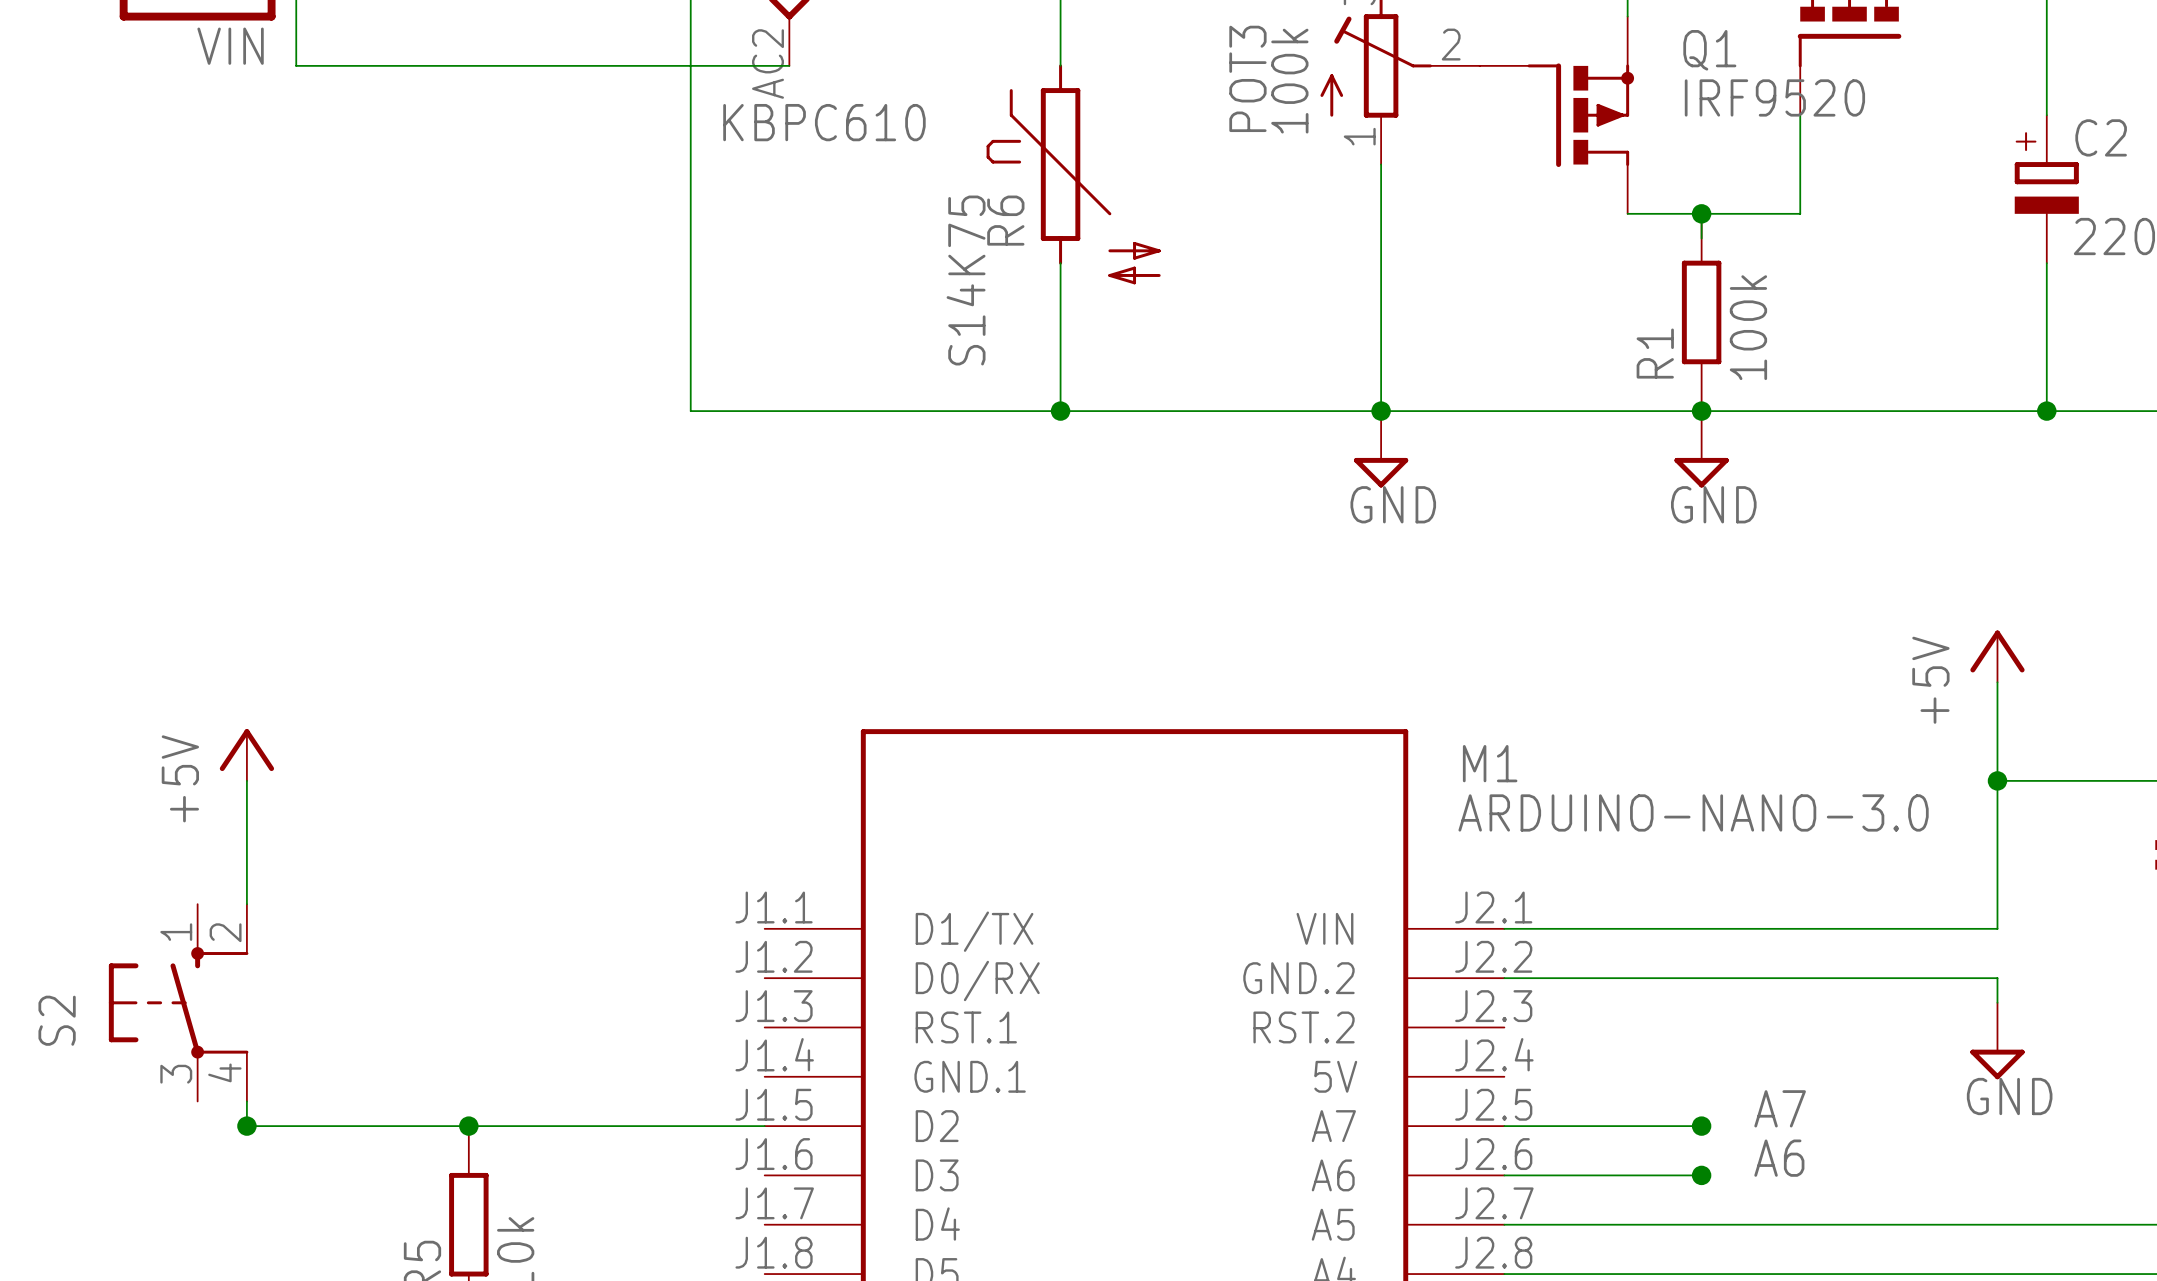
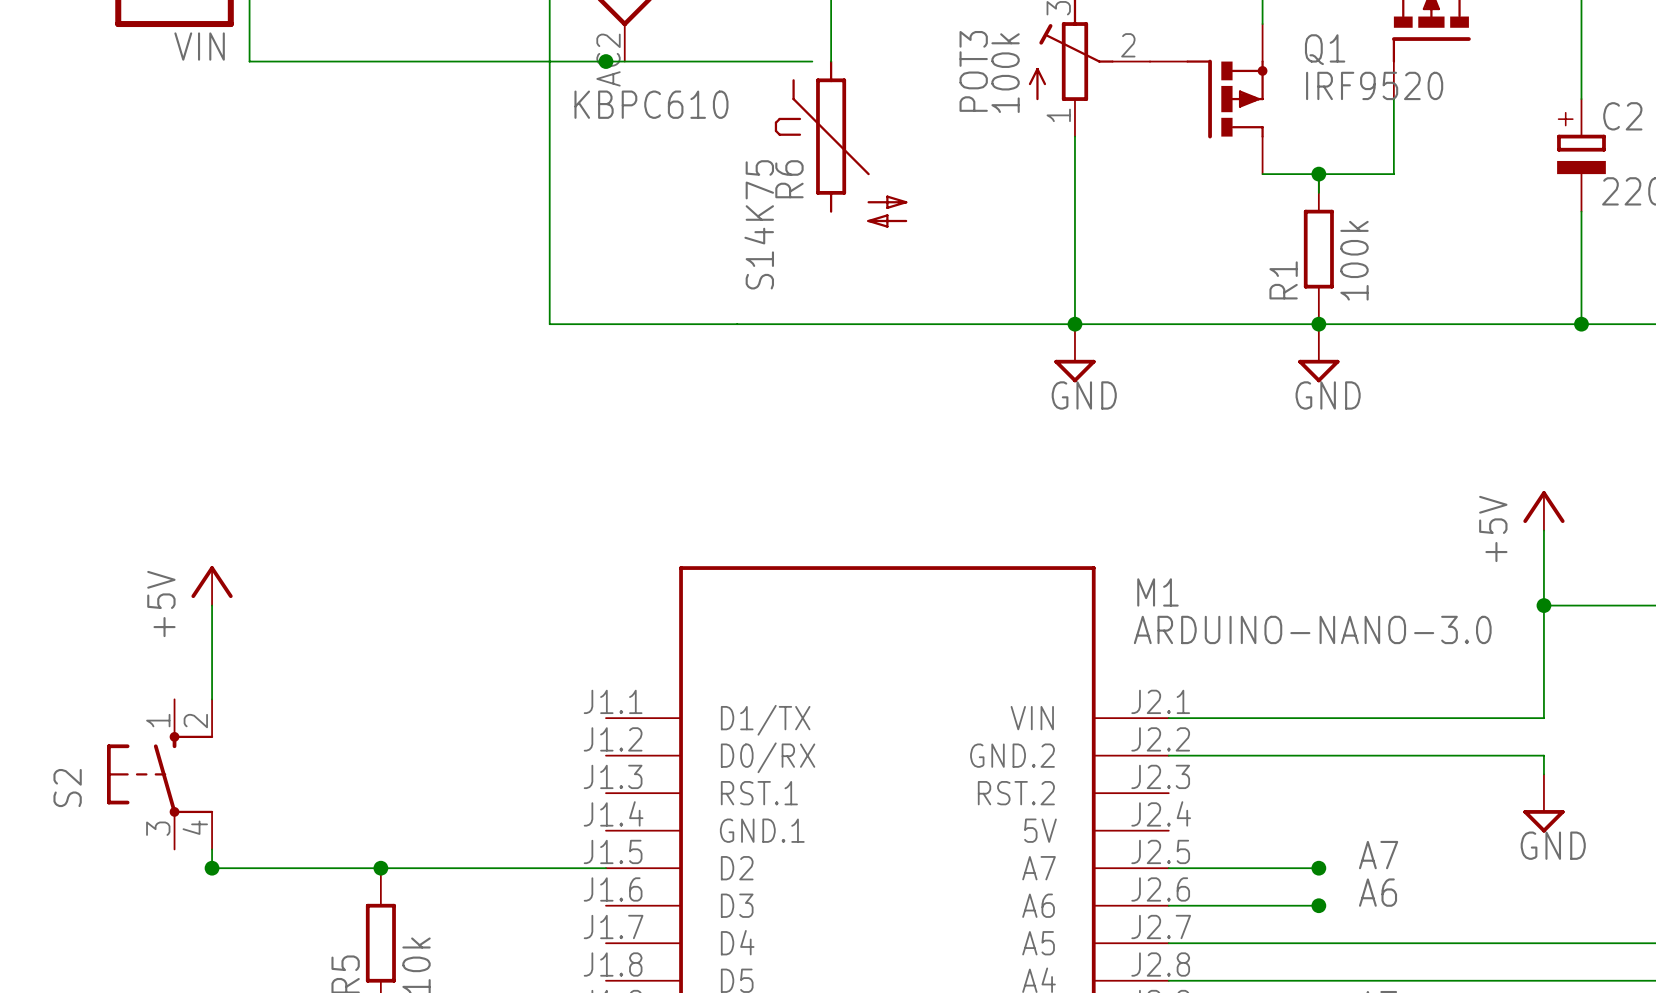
junction: none -> (605, 61)
wire: none -> (624, 61) (812, 61)
wire: (1060, 263) (1060, 411) -> none
junction: (1060, 411) -> none

